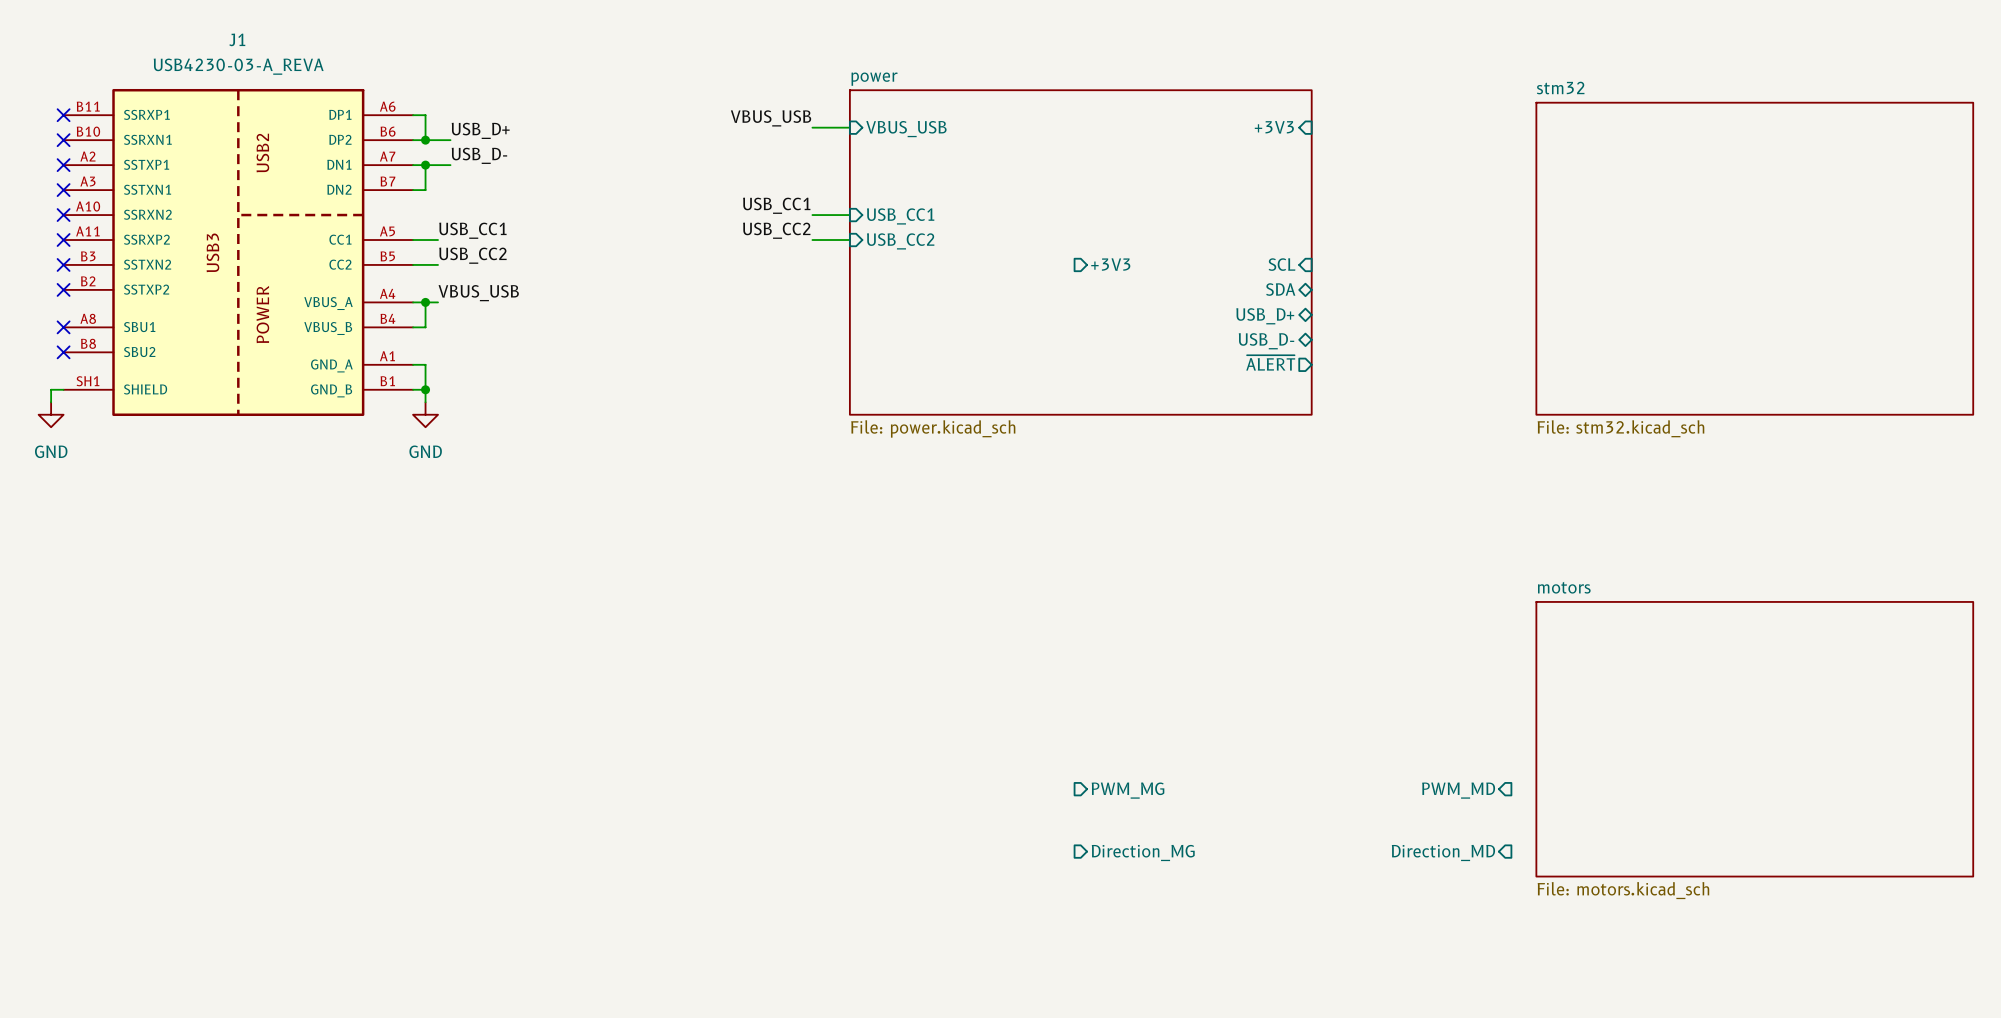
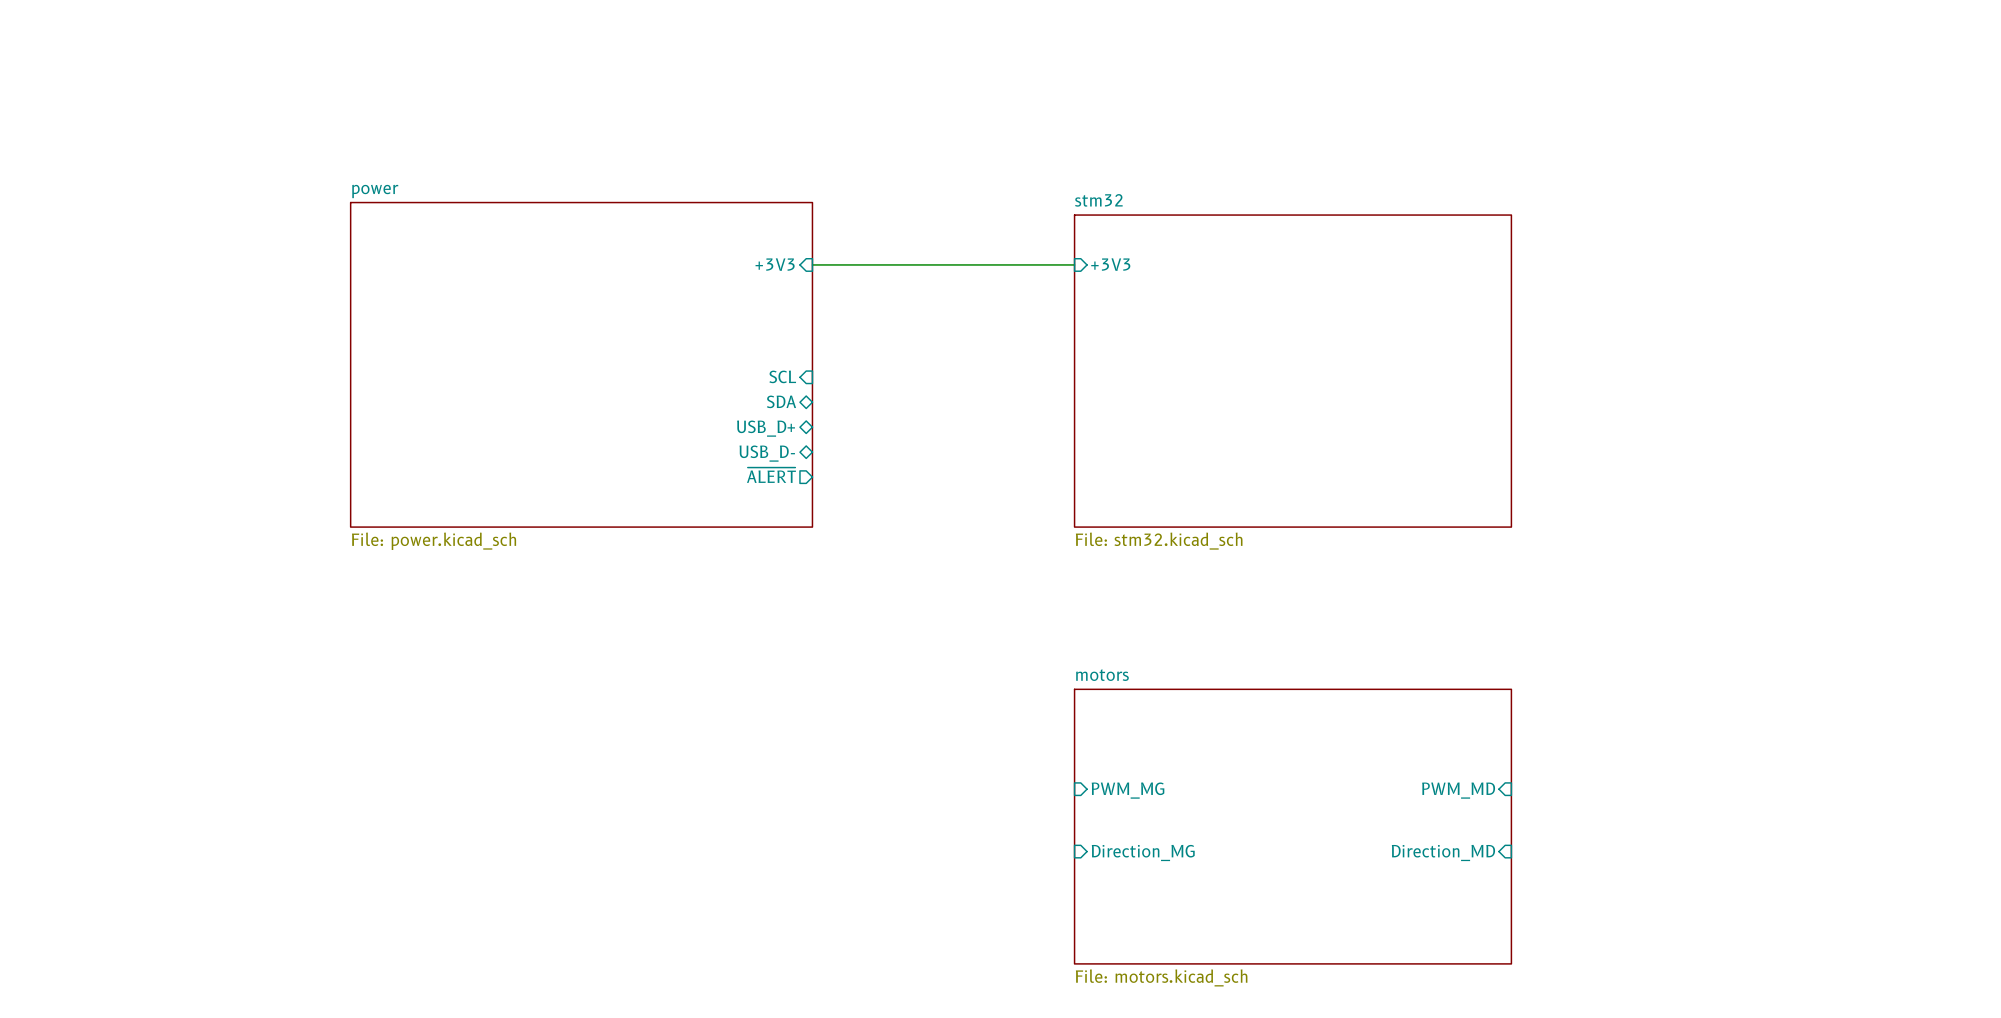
no-connect mark: (63, 115) -> none
wire: (413, 115) (425, 115) (425, 140) -> none
label: VBUS_USB (771, 118) -> none
wire: (812, 127) (849, 127) -> none
sheet pin: +3V3 (1274, 127) -> none
sheet pin: VBUS_USB (906, 129) -> none
label: USB_D+ (480, 130) -> none
no-connect mark: (63, 140) -> none
wire: (413, 140) (450, 140) -> none
junction: (425, 140) -> none
label: USB_D- (479, 155) -> none
no-connect mark: (63, 165) -> none
wire: (413, 165) (450, 165) -> none
wire: (425, 165) (425, 190) (413, 190) -> none
junction: (425, 165) -> none
no-connect mark: (63, 190) -> none
label: USB_CC1 (776, 205) -> none
no-connect mark: (63, 215) -> none
wire: (812, 215) (849, 215) -> none
sheet pin: USB_CC1 (900, 216) -> none
label: USB_CC1 (472, 230) -> none
label: USB_CC2 (776, 230) -> none
no-connect mark: (63, 240) -> none
wire: (413, 240) (438, 240) -> none
wire: (812, 240) (849, 240) -> none
sheet pin: USB_CC2 (900, 241) -> none
J1: USB4230-03-A_REVA (238, 252) -> none
sheet power: File: power.kicad_sch (1080, 252) -> none
label: USB_CC2 (472, 255) -> none
sheet stm32 position: (1754, 258) -> (1292, 371)
no-connect mark: (63, 264) -> none
wire: (413, 264) (438, 264) -> none
sheet pin: none -> +3V3 (775, 264)
wire: none -> (812, 264) (1074, 264)
sheet pin: SCL (1281, 264) -> none
no-connect mark: (63, 289) -> none
sheet pin: SDA (1280, 289) -> none
label: VBUS_USB (478, 293) -> none
wire: (413, 302) (438, 302) -> none
wire: (425, 302) (425, 327) (413, 327) -> none
junction: (425, 302) -> none
sheet pin: USB_D+ (1265, 316) -> none
no-connect mark: (63, 327) -> none
sheet pin: USB_D- (1266, 341) -> none
no-connect mark: (63, 352) -> none
sheet pin: ~{ALERT} (1270, 362) -> none
wire: (413, 364) (425, 364) (425, 402) -> none
sheet power: none -> File: power.kicad_sch (581, 364)
sheet pin: none -> SCL (782, 376)
wire: (63, 389) (51, 389) (51, 402) -> none
wire: (413, 389) (425, 389) -> none
junction: (425, 389) -> none
sheet pin: none -> SDA (781, 401)
power symbol: GND (51, 414) -> none
power symbol: GND (425, 414) -> none
sheet pin: none -> USB_D+ (766, 428)
sheet pin: none -> USB_D- (767, 453)
sheet pin: none -> ~{ALERT} (771, 475)
sheet motors: File: motors.kicad_sch (1754, 739) -> none
sheet motors: none -> File: motors.kicad_sch (1292, 826)

